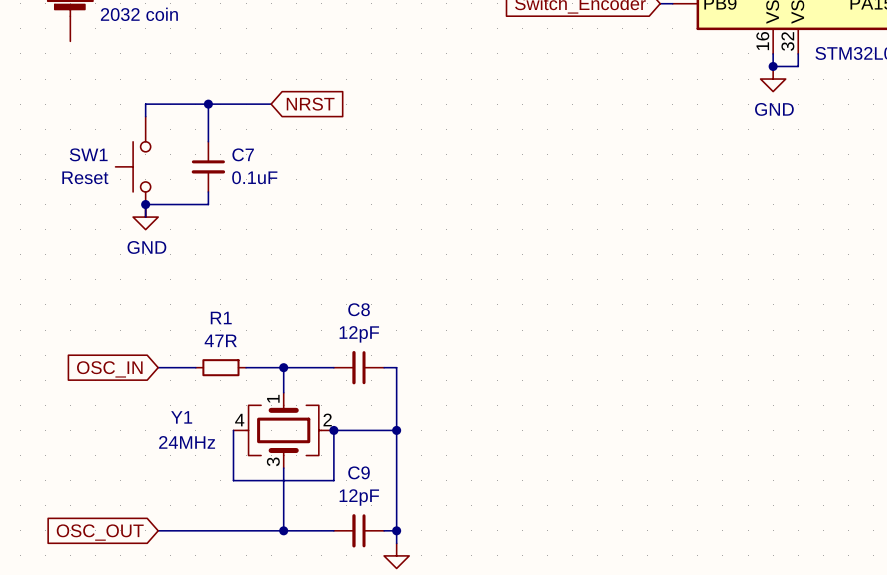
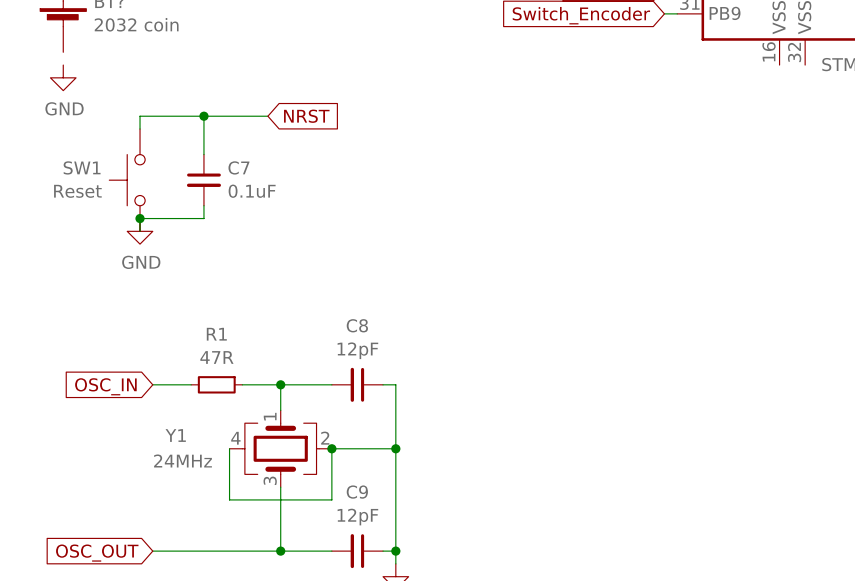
wire: (773, 53) (773, 66) (798, 66) (798, 53) -> none
power symbol: none -> GND (63, 77)
junction: (773, 66) -> none
power symbol: GND (773, 79) -> none

